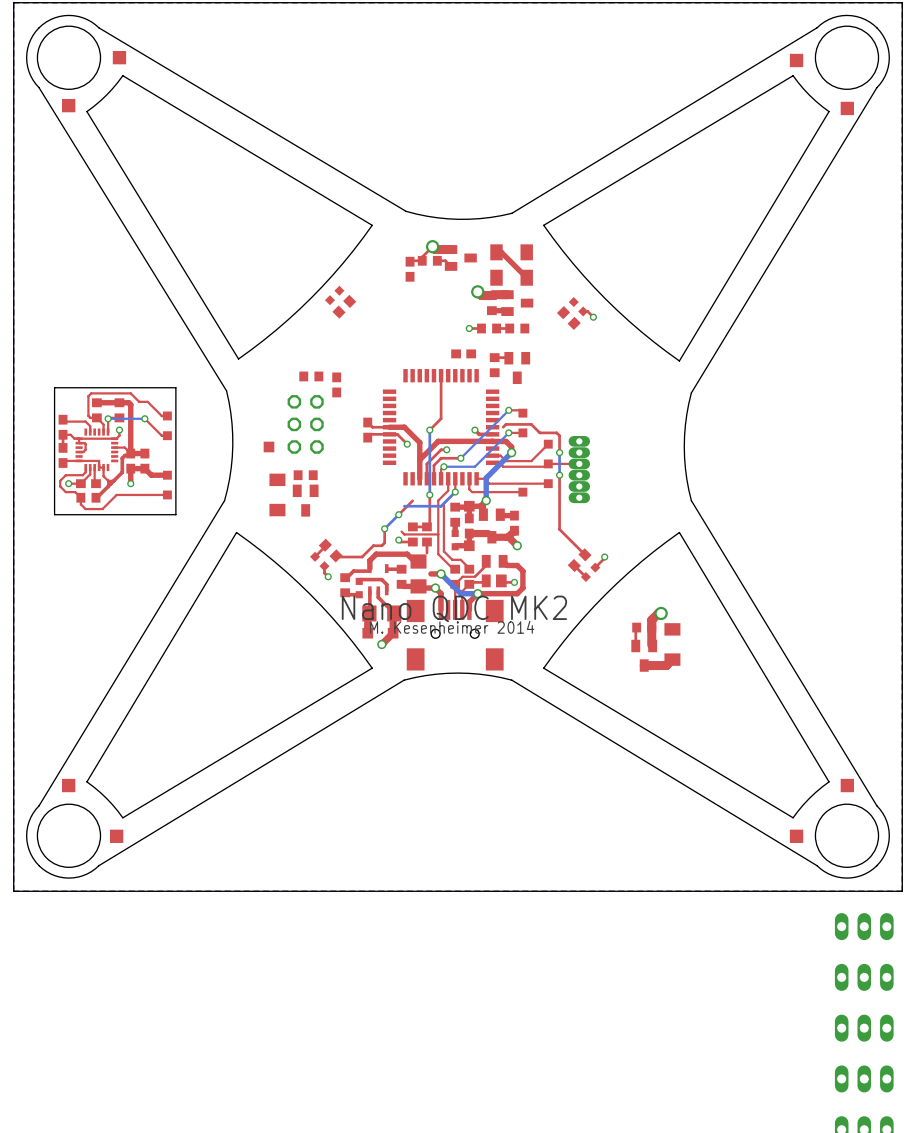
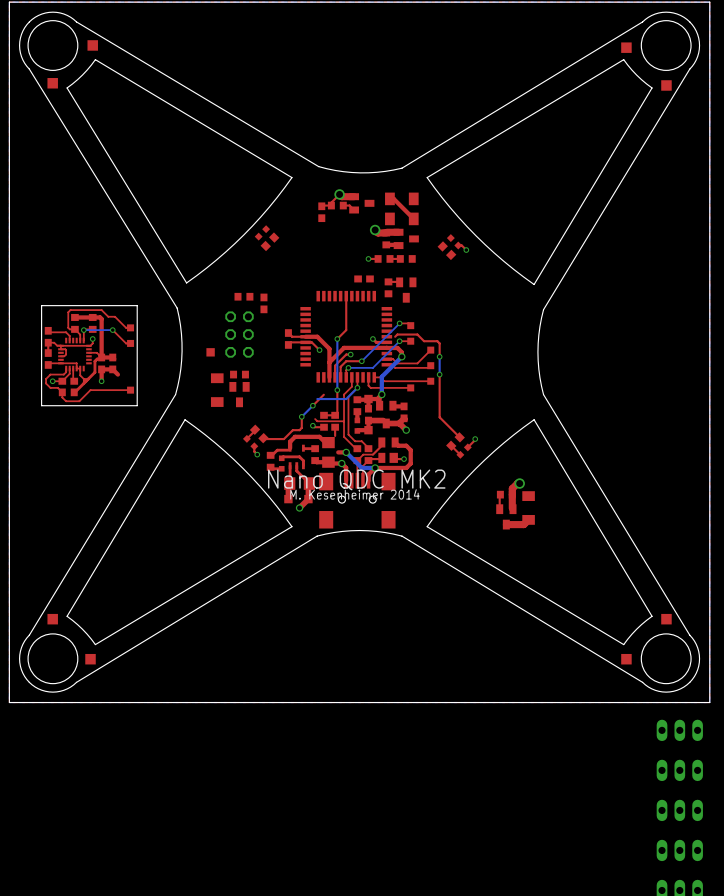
top track: (579, 463) (548, 463) -> none
part: (579, 469) -> none
top track: (167, 475) (151, 475) -> none
part: (167, 475) -> none

